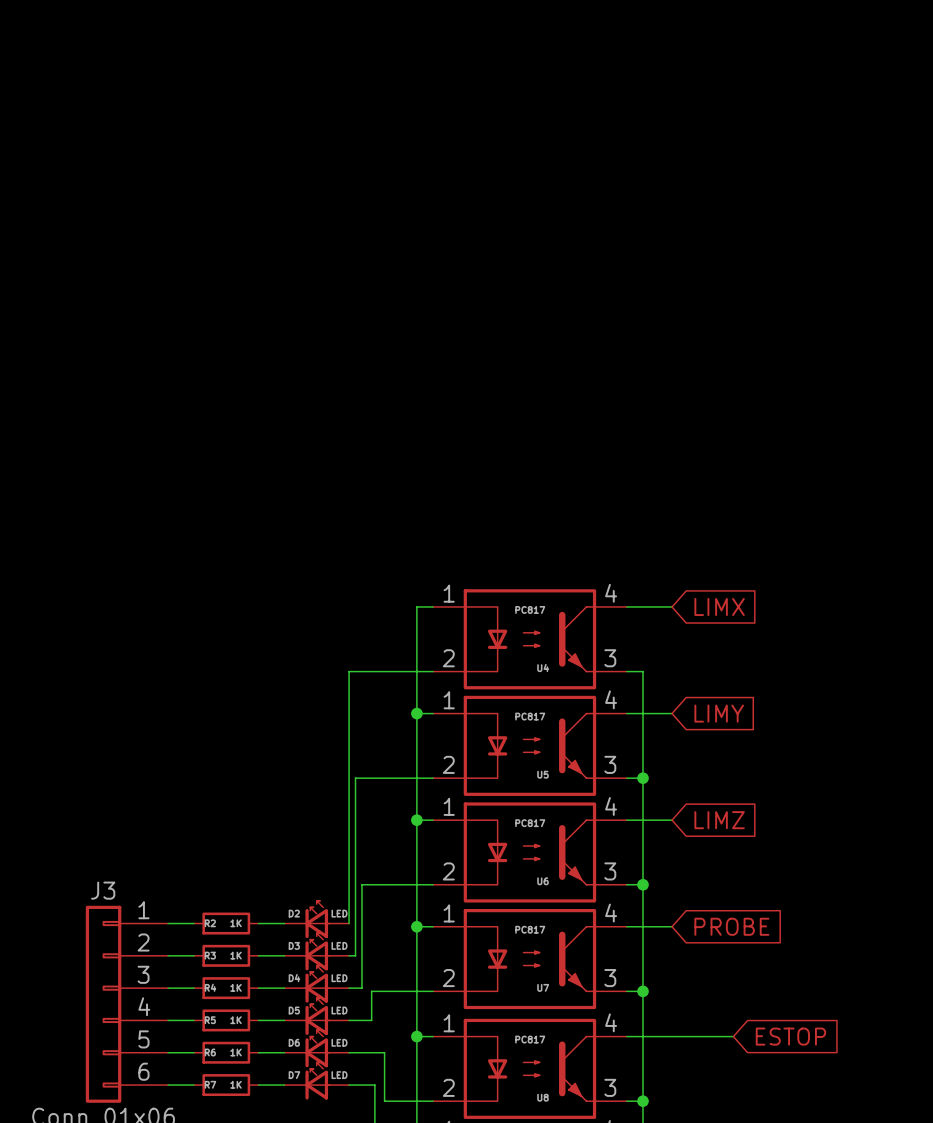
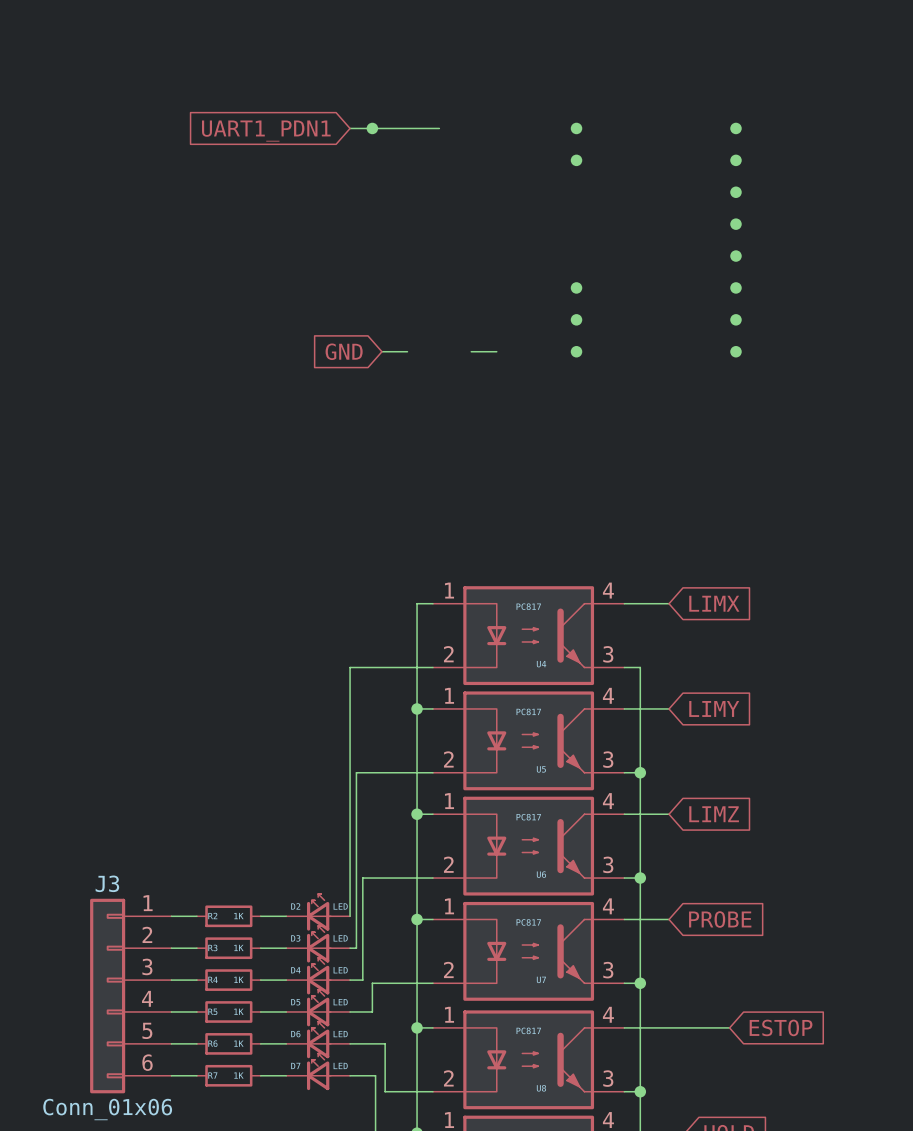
wire: none -> (350, 128) (439, 128)
junction: none -> (372, 128)
junction: none -> (576, 128)
junction: none -> (735, 128)
global label: none -> UART1_PDN1 (266, 131)
junction: none -> (576, 160)
junction: none -> (735, 160)
junction: none -> (735, 192)
junction: none -> (735, 224)
junction: none -> (735, 256)
junction: none -> (576, 287)
junction: none -> (735, 287)
junction: none -> (576, 319)
junction: none -> (735, 319)
global label: none -> GND (344, 351)
wire: none -> (381, 351) (407, 351)
wire: none -> (471, 351) (496, 351)
junction: none -> (576, 351)
junction: none -> (735, 351)

